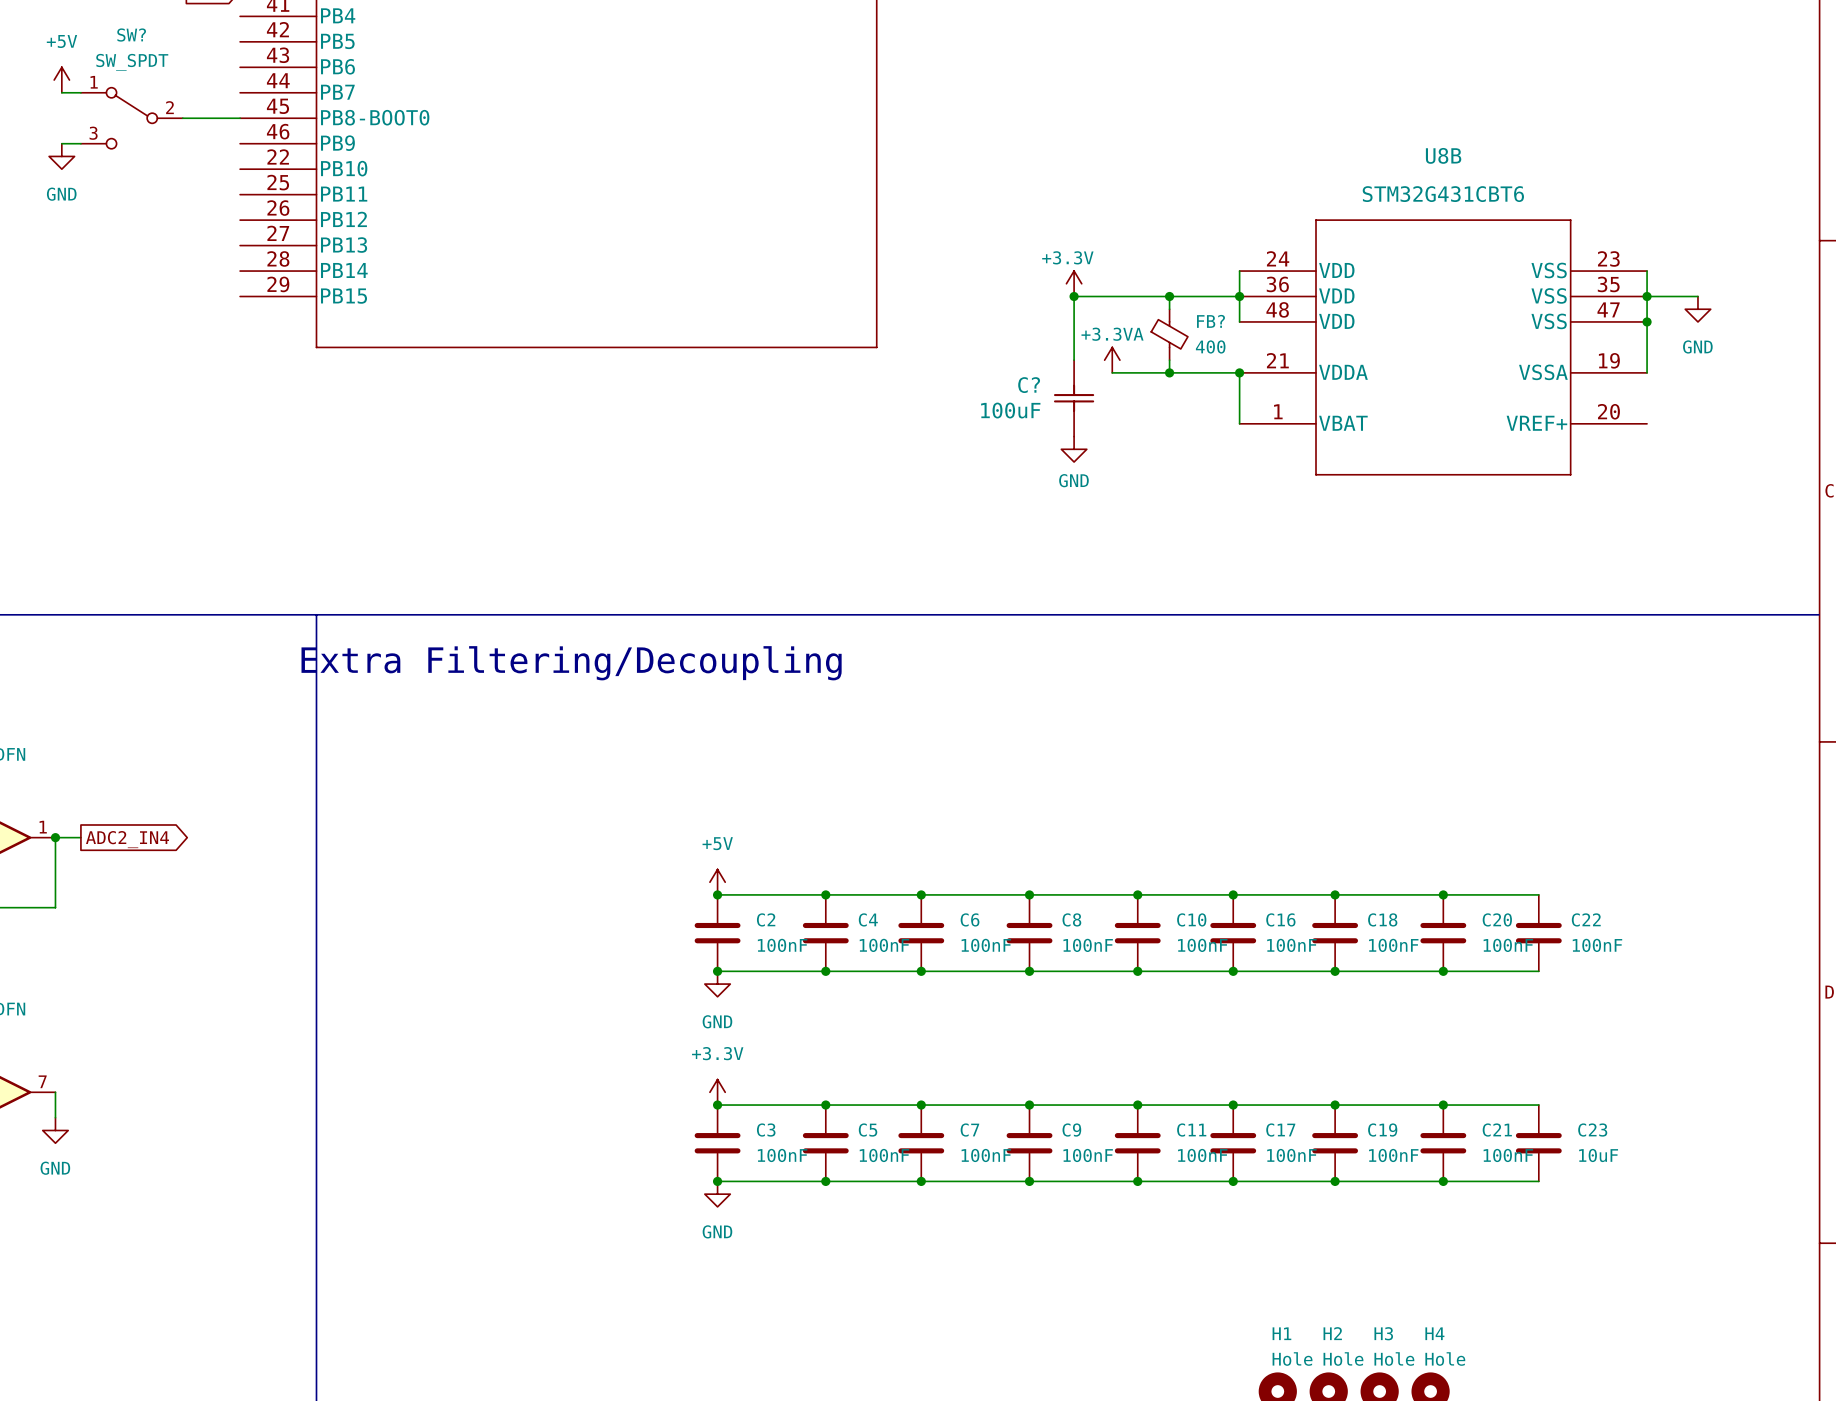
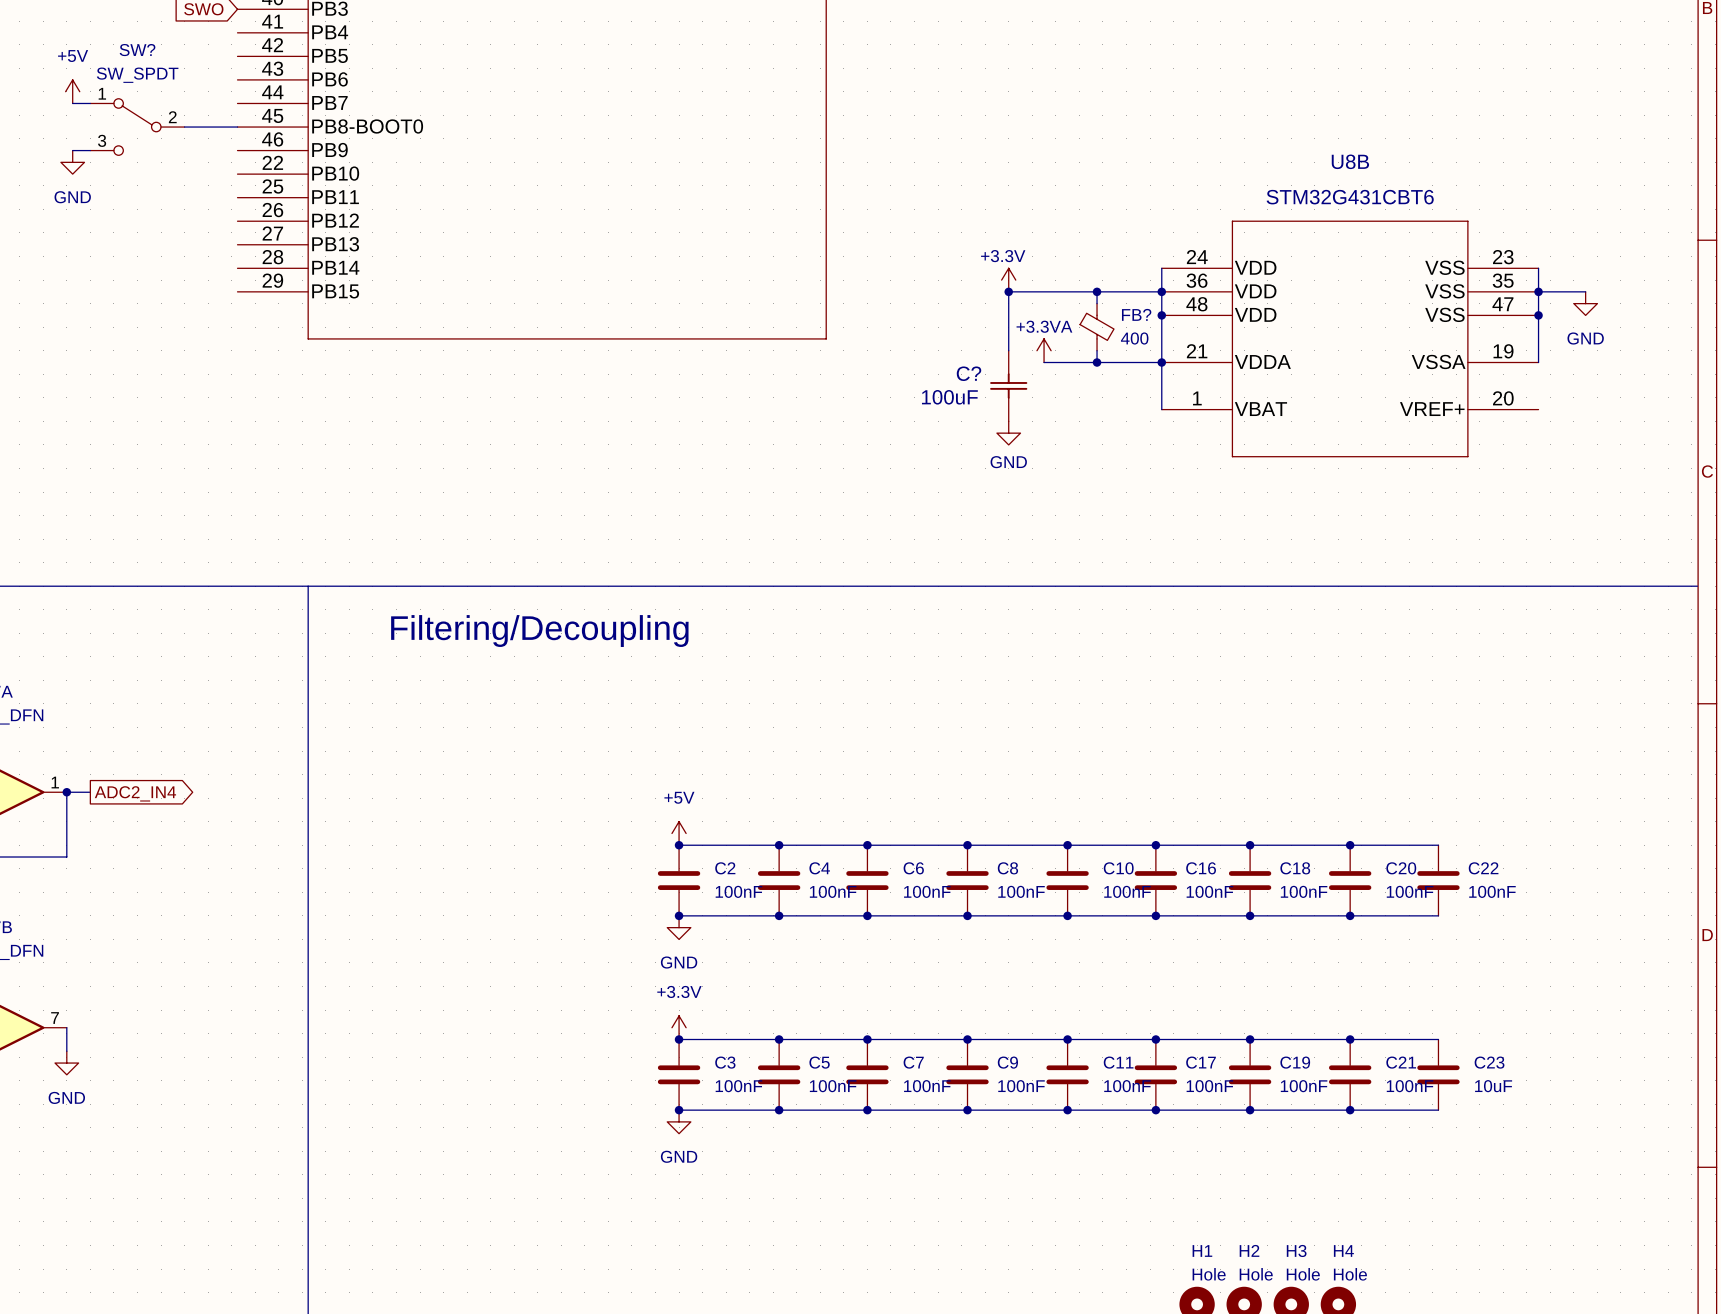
wire: none -> (1161, 315) (1161, 362)
junction: none -> (1161, 315)
text: Extra Filtering/Decoupling (571, 663) -> Filtering/Decoupling (539, 631)

